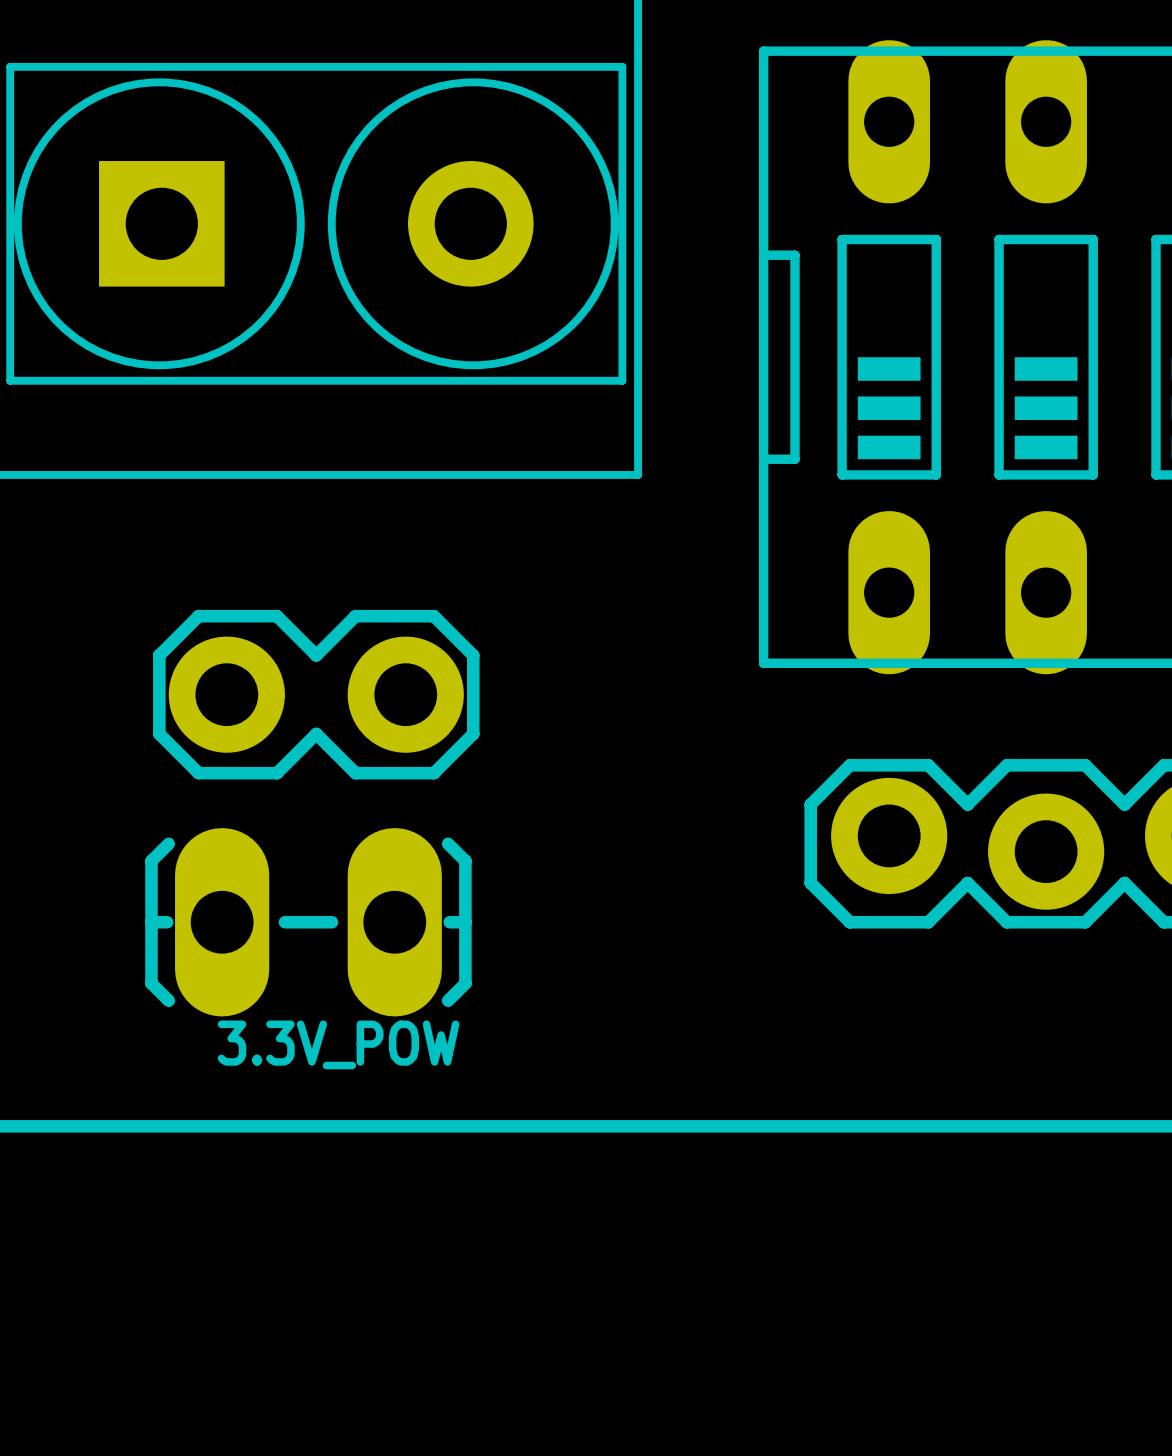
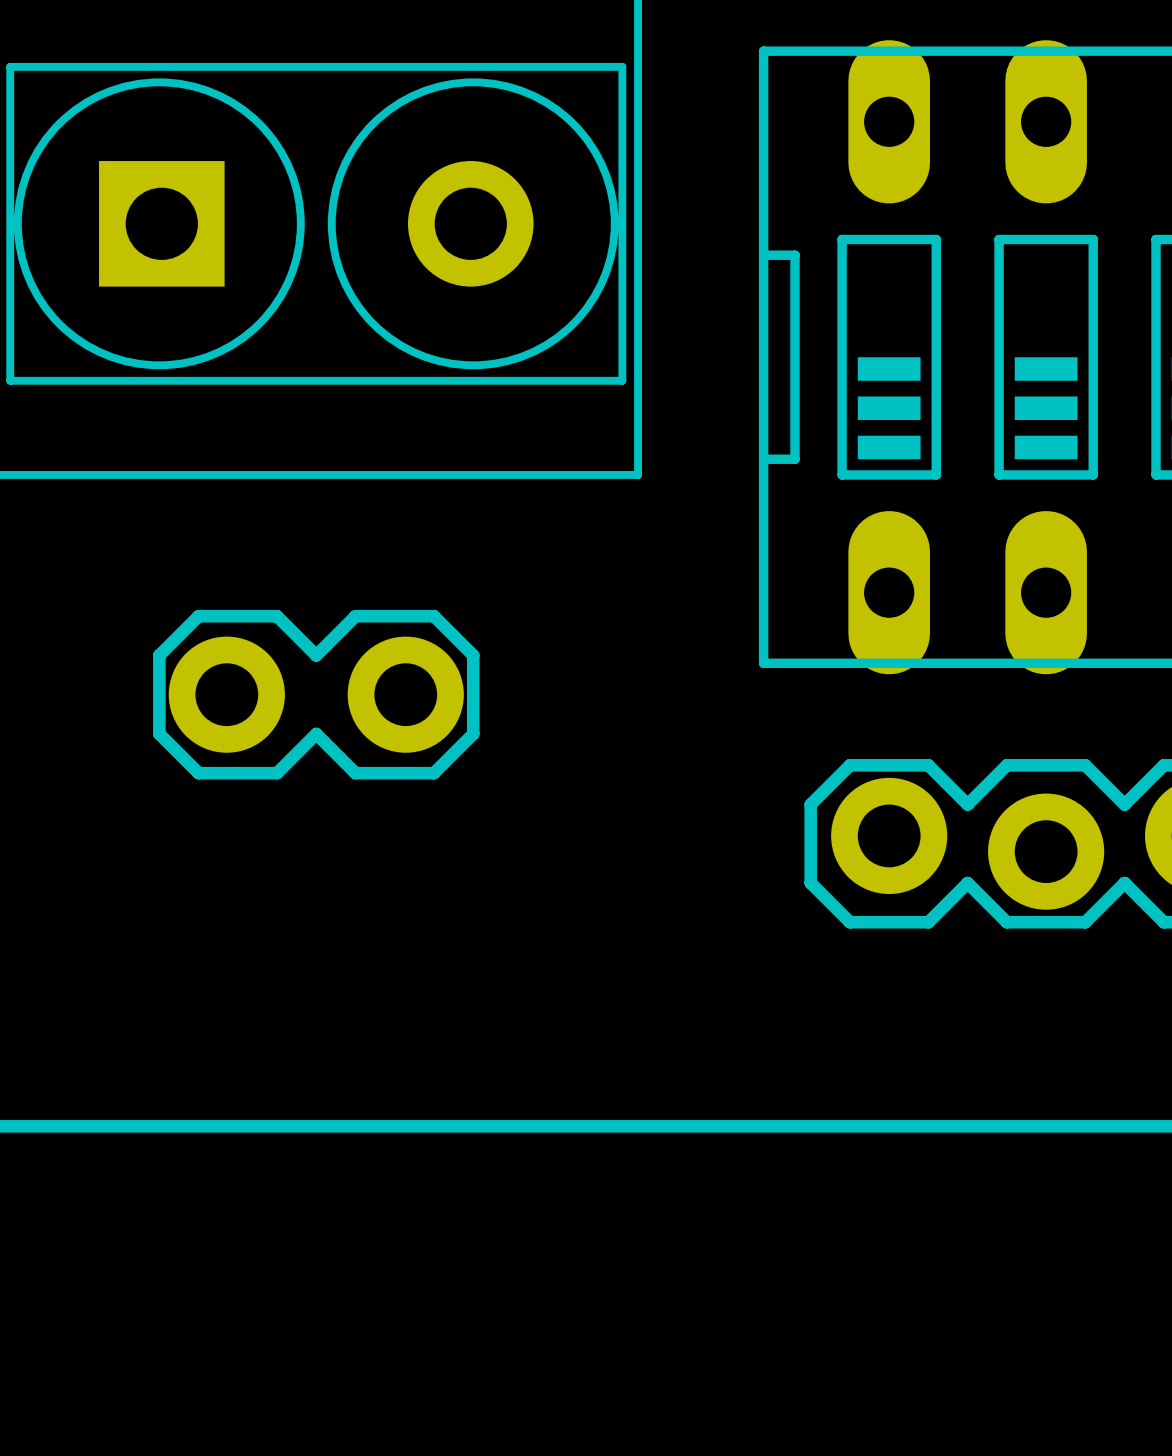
3.3V_POW: (308, 922) -> none

